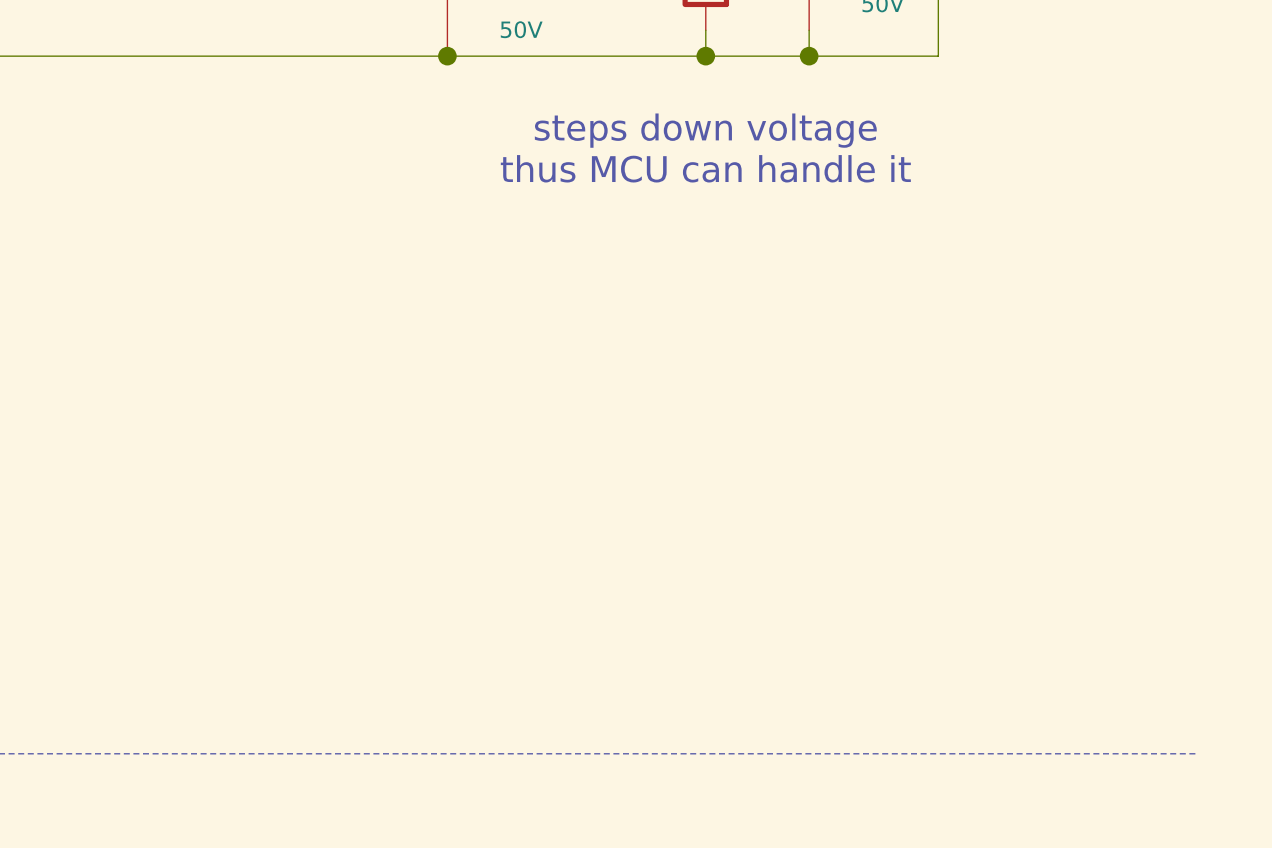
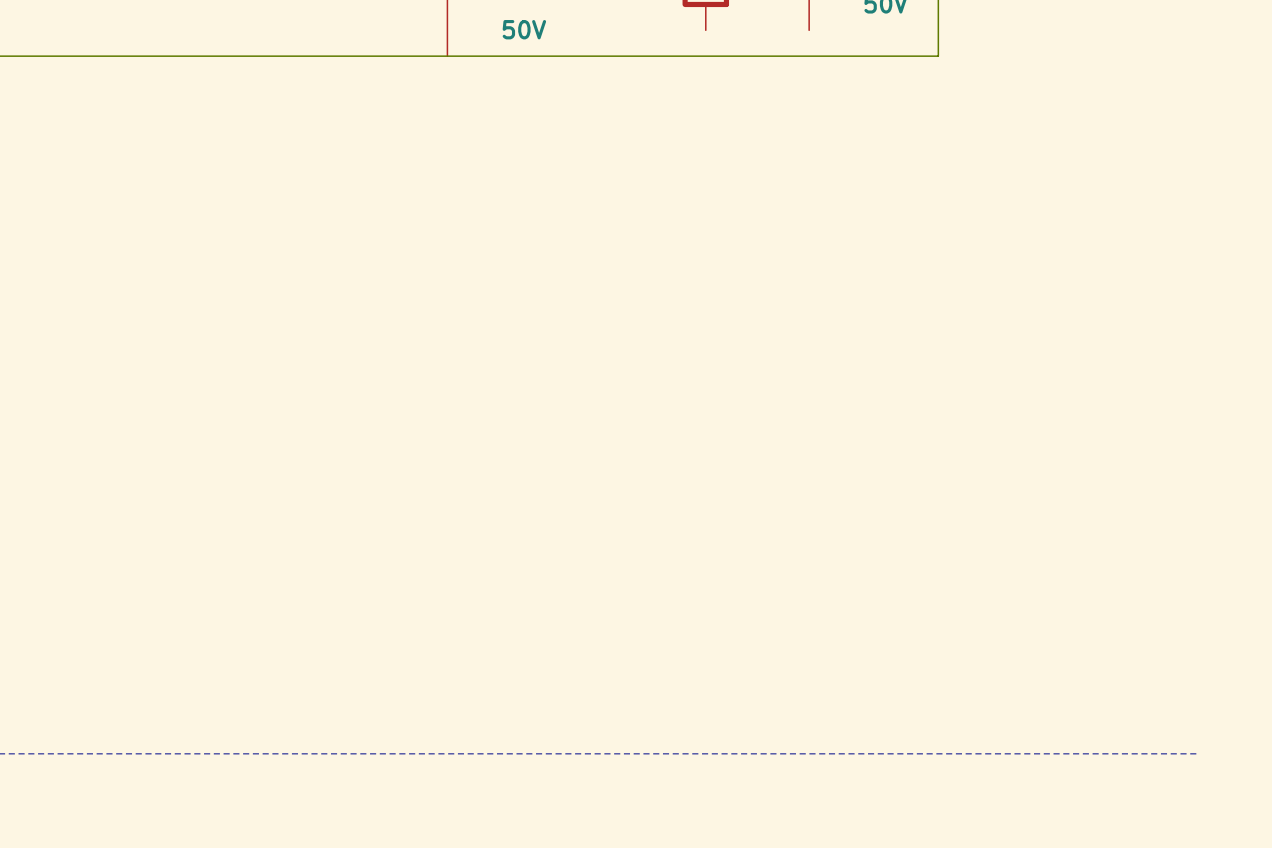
wire: (705, 30) (705, 56) -> none
wire: (809, 30) (809, 56) -> none
junction: (447, 56) -> none
junction: (705, 56) -> none
junction: (809, 56) -> none
text: steps down voltage (705, 130) -> none
text: thus MCU can handle it (705, 168) -> none

